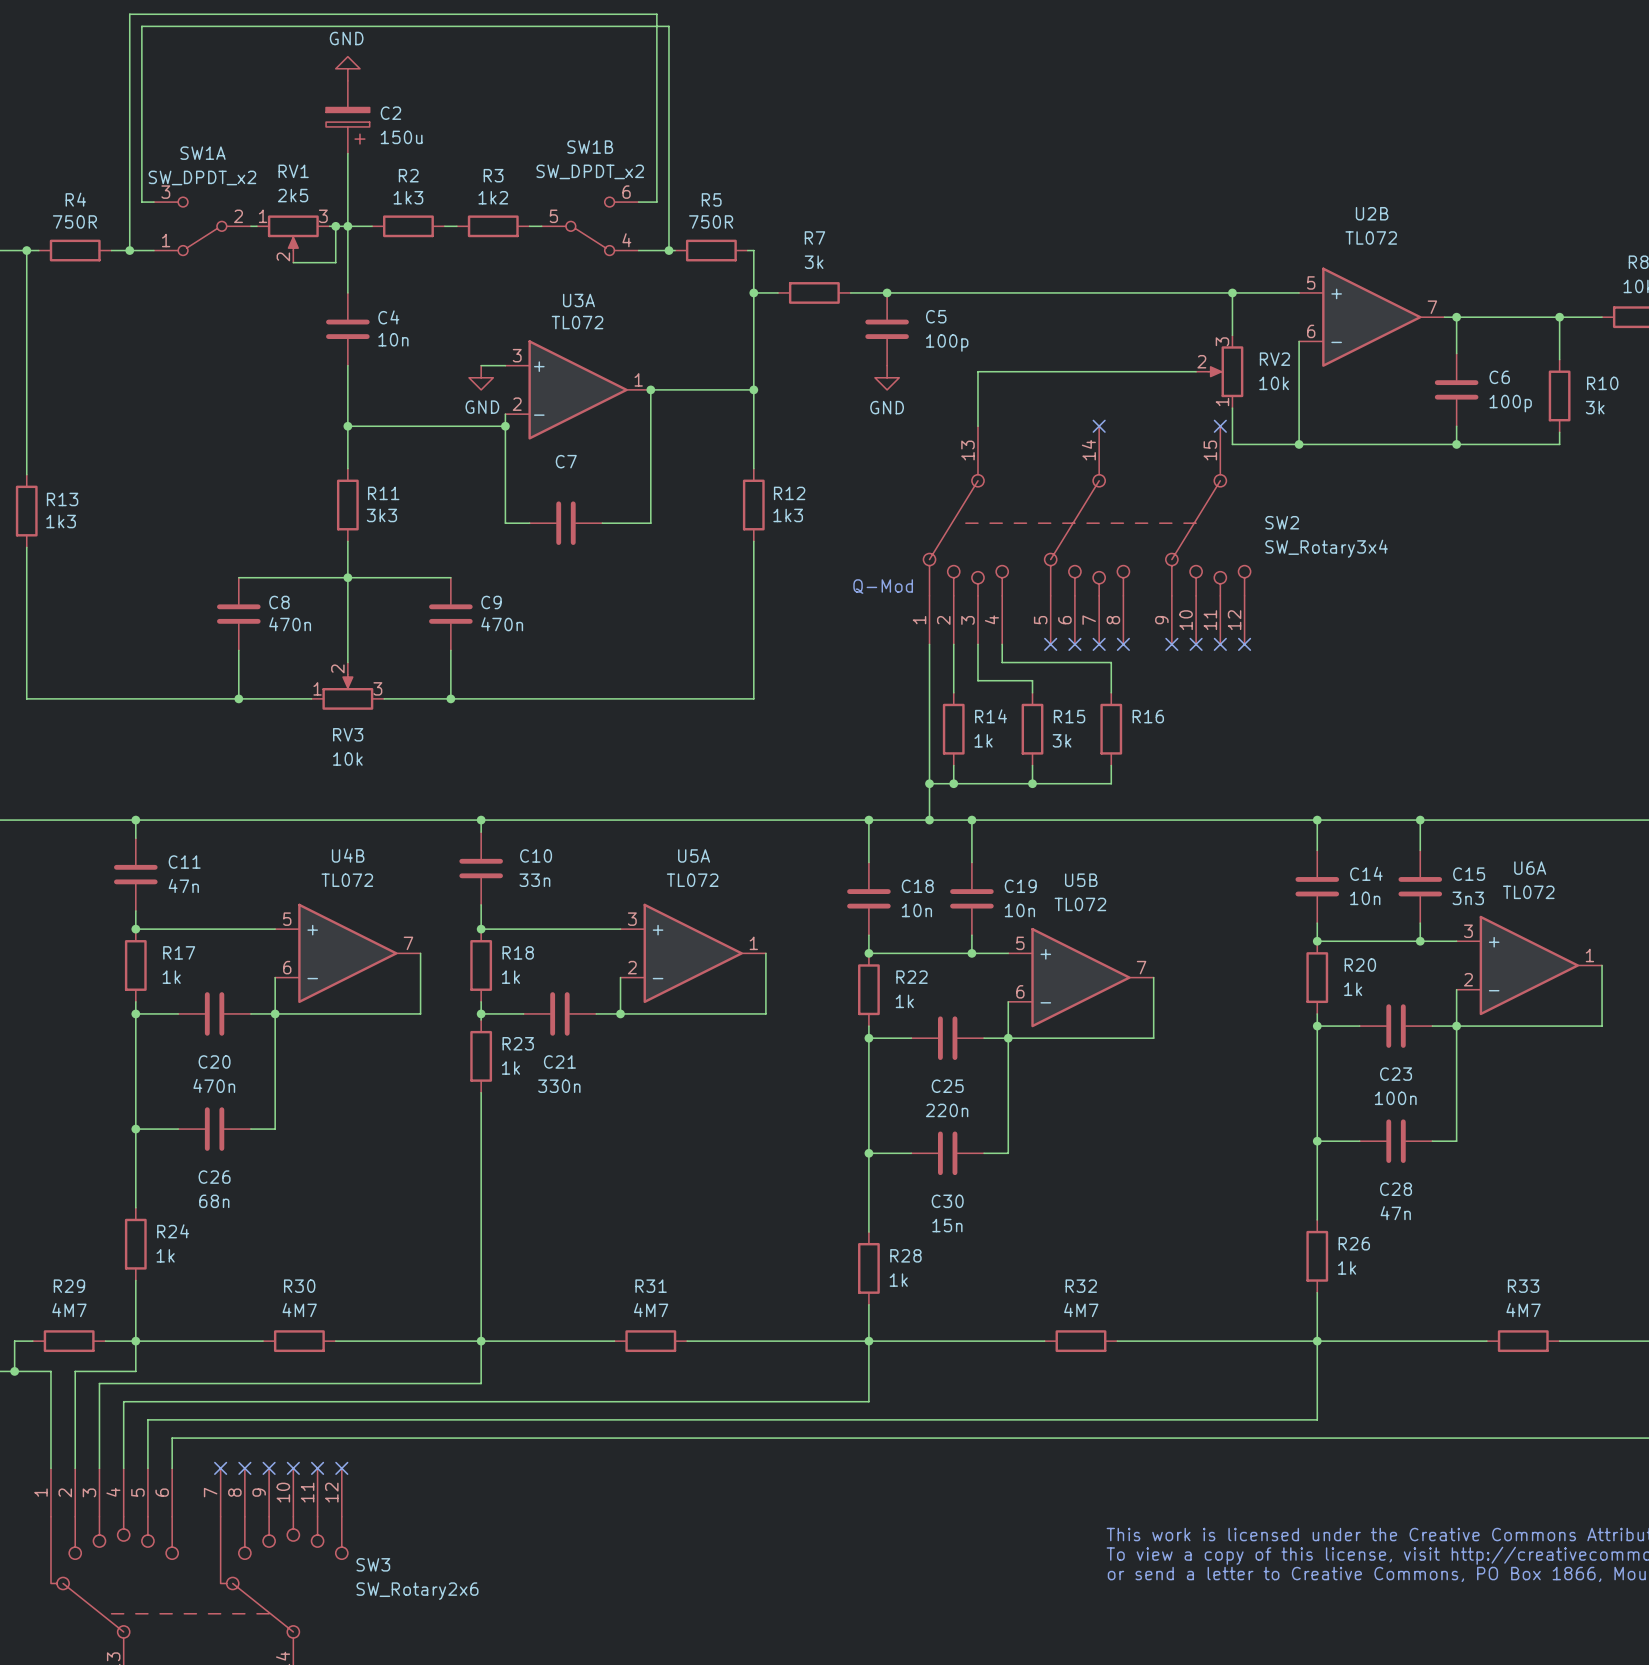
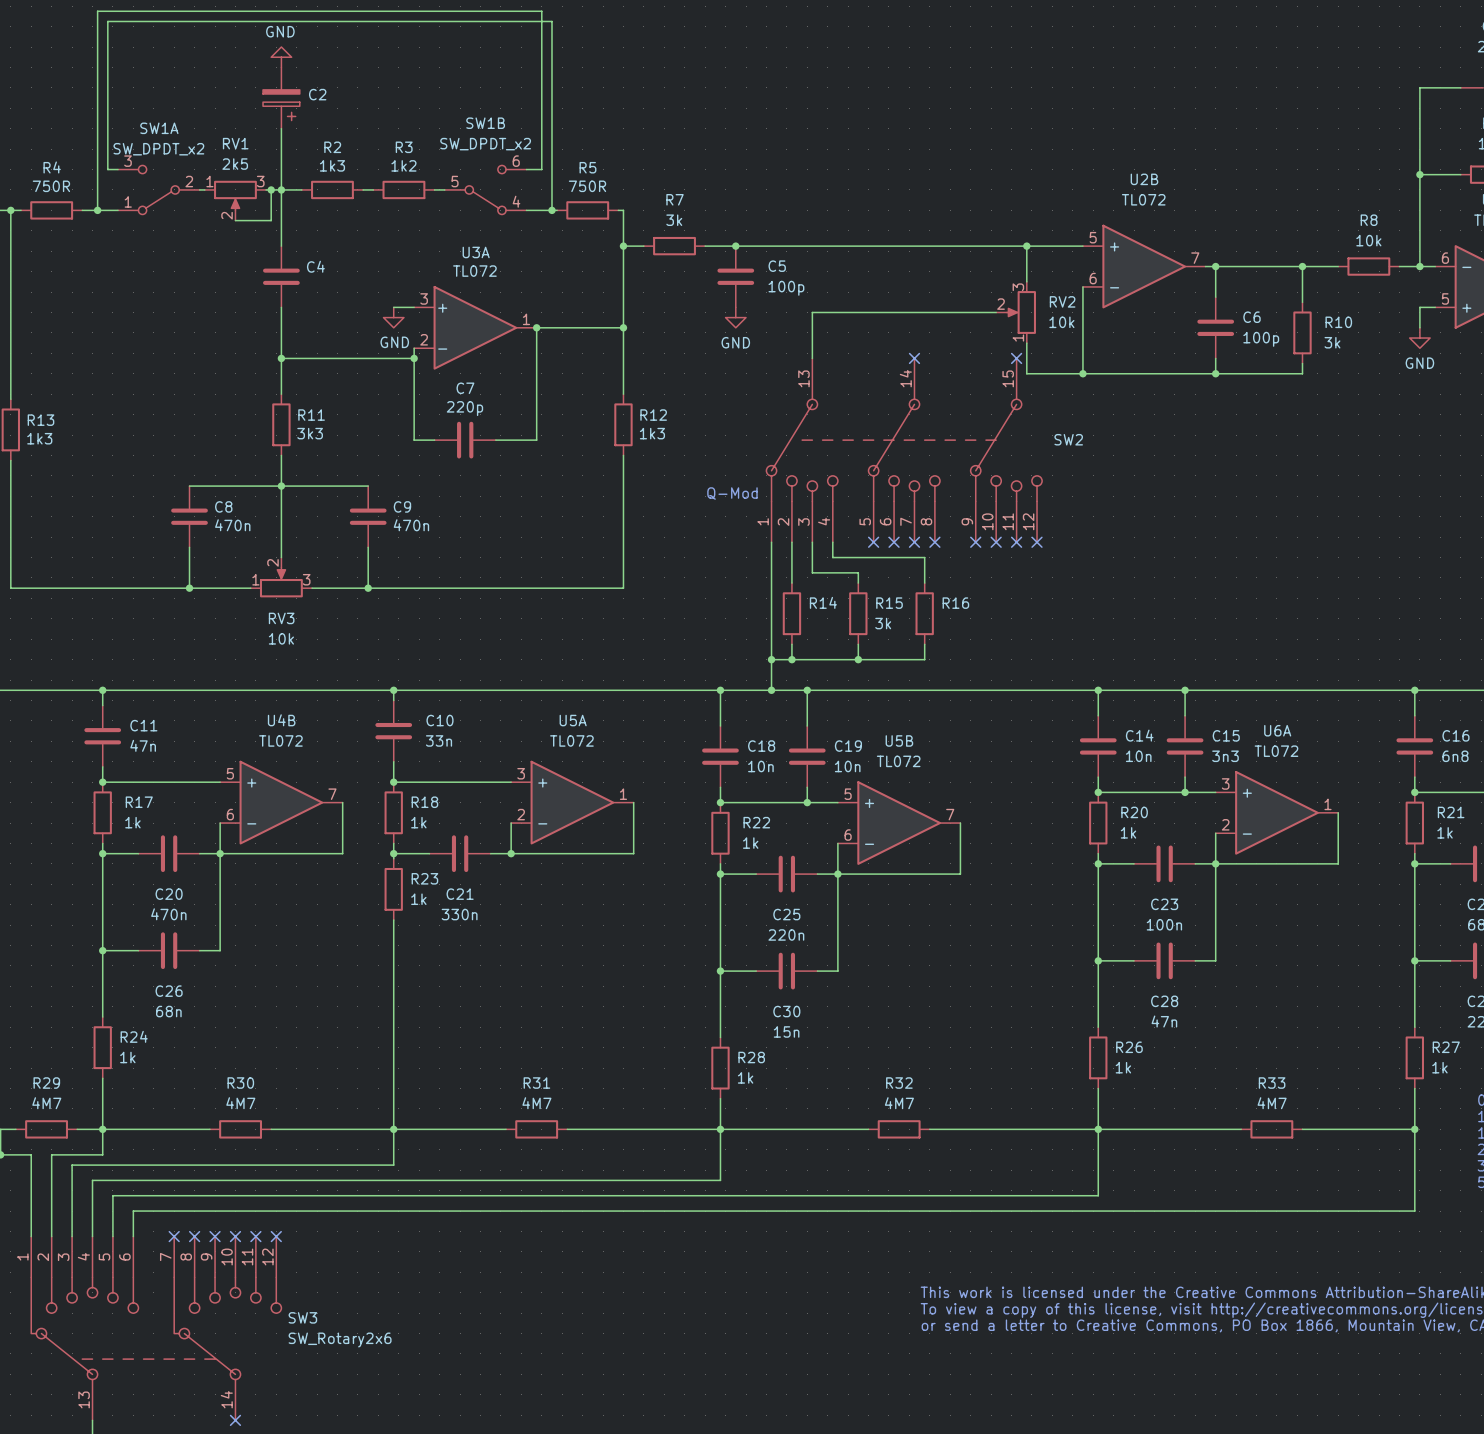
C2 value: 150u (401, 137) -> none
C4 value: 10n (393, 339) -> none
C7 value: none -> 220p (464, 408)
SW2 value: SW_Rotary3x4 (1326, 548) -> none
R14 value: 1k (983, 740) -> none

